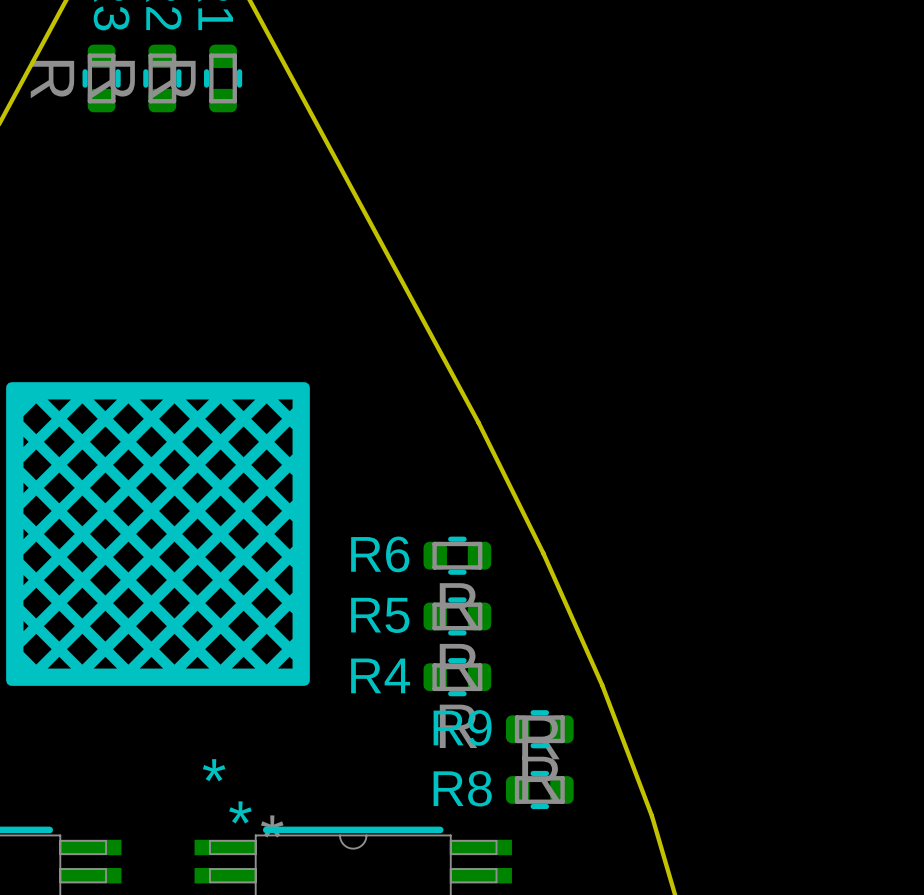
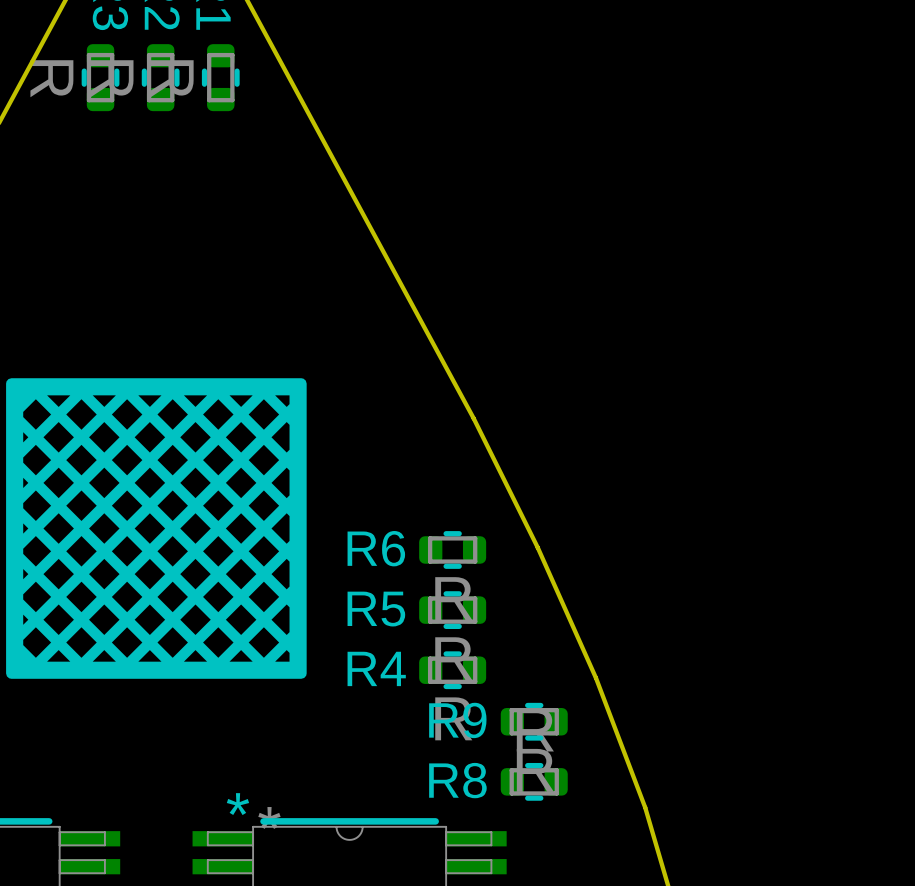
part text: * (214, 770) -> none

